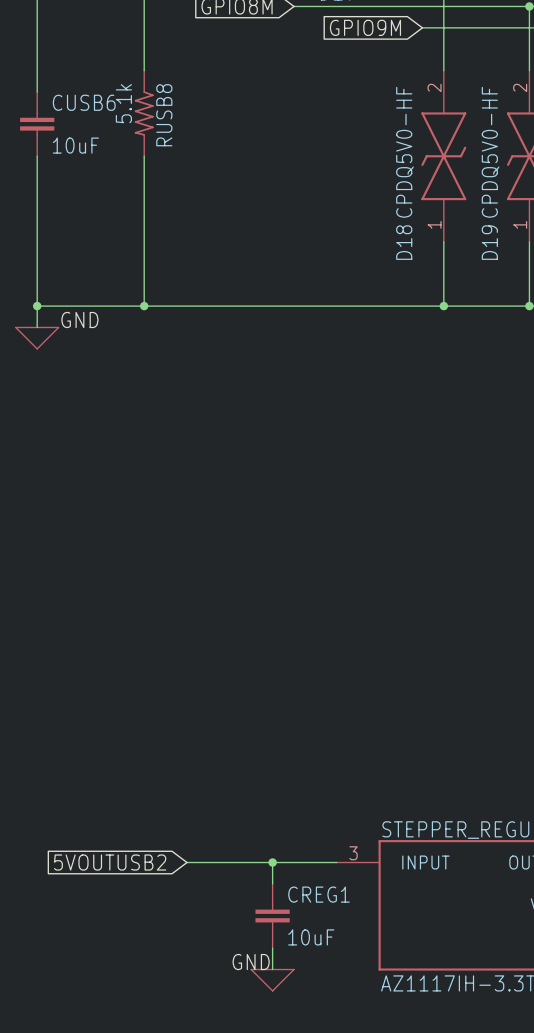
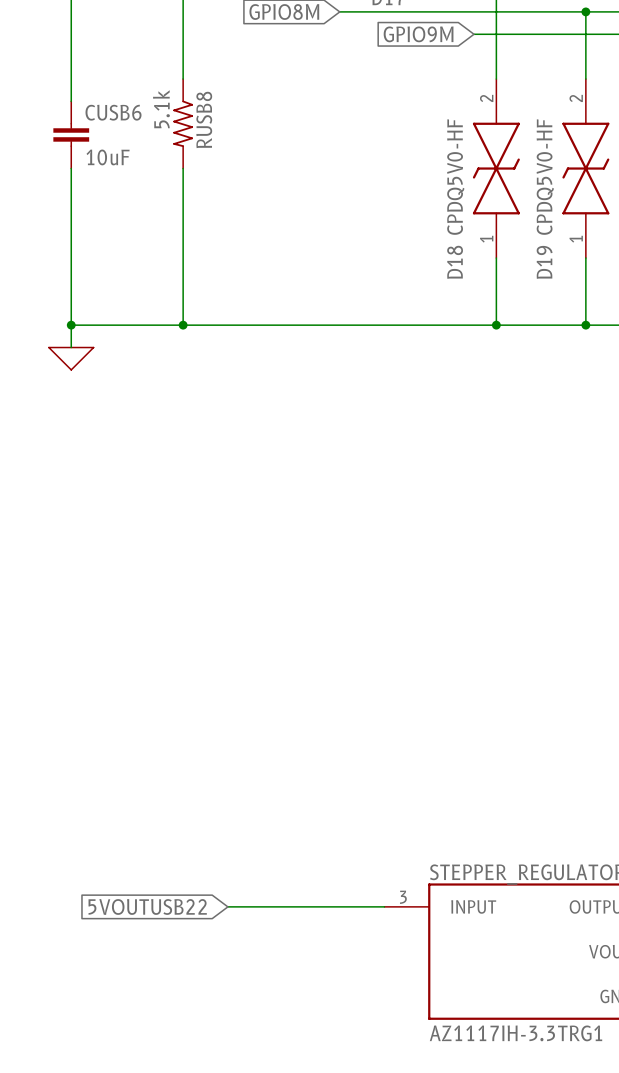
label: GND (79, 320) -> none
global label: 5VOUTUSB2 (110, 862) -> 5VOUTUSB22 (147, 906)
wire: (272, 862) (272, 883) -> none
junction: (272, 862) -> none
CREG1: 10uF (272, 916) -> none
wire: (272, 948) (272, 969) -> none
label: GND (251, 962) -> none
power symbol: (272, 980) -> none

